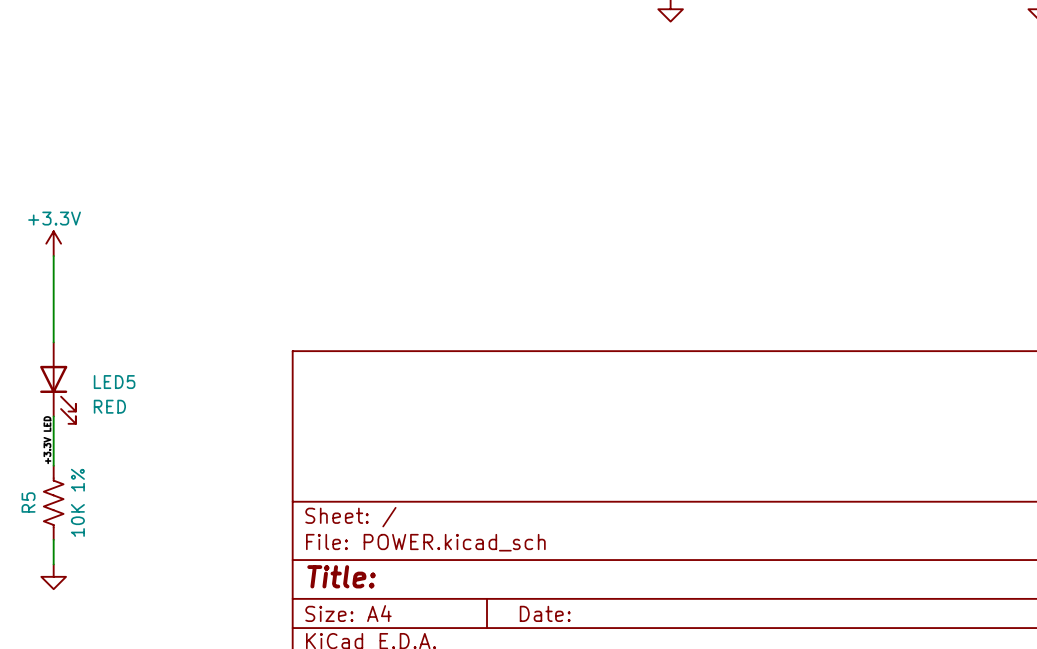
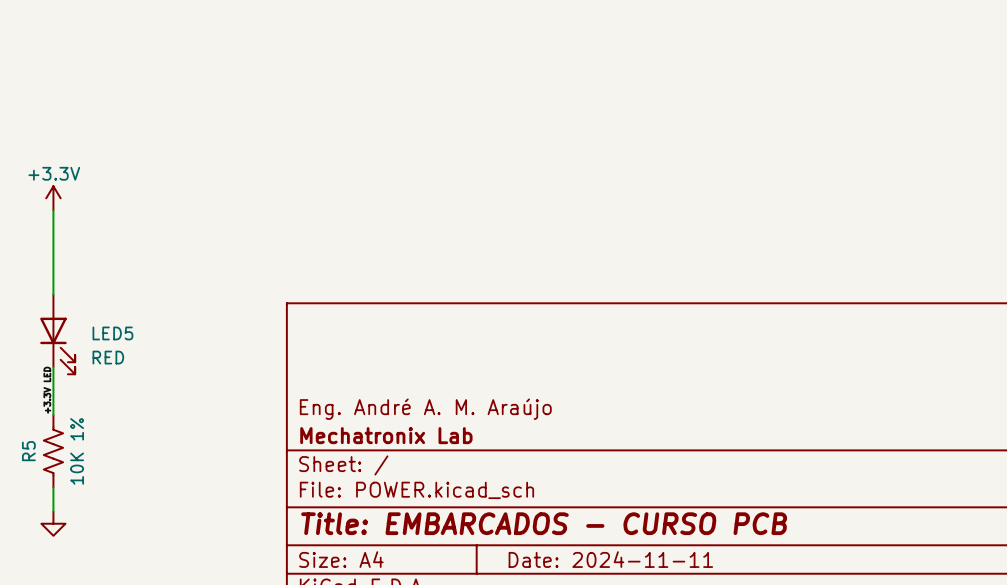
title block: none -> Eng. André A. M. Araújo (425, 409)
title block: none -> Mechatronix Lab (386, 435)
title block: Title: (341, 576) -> Title: EMBARCADOS - CURSO PCB (544, 523)
title block: Date: (545, 613) -> Date: 2024-11-11 (610, 559)

